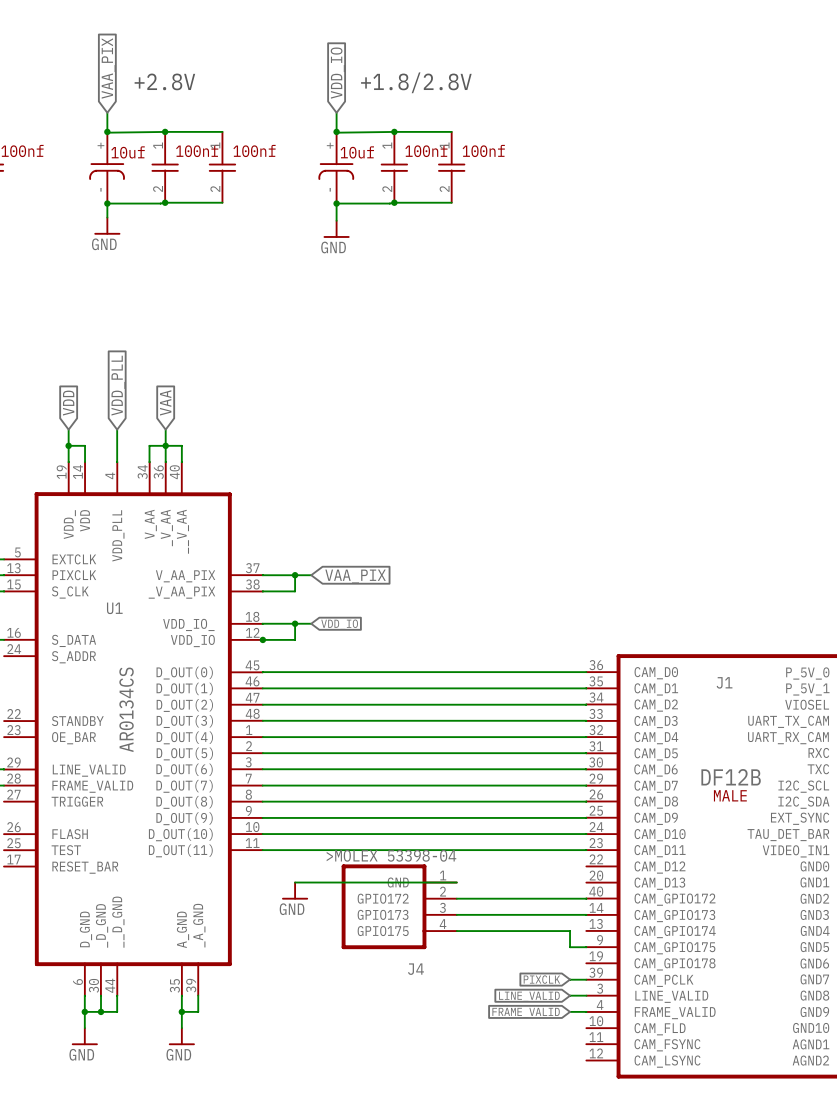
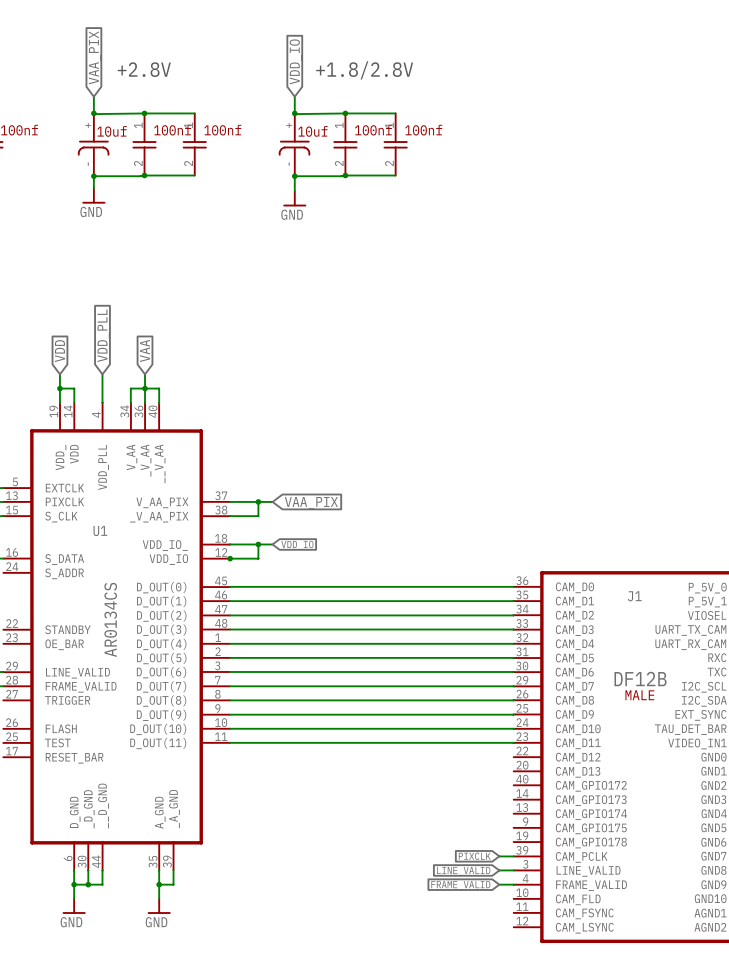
wire: (295, 882) (456, 882) -> none
power symbol: GND (295, 891) -> none
wire: (586, 898) (456, 898) -> none
J4: (399, 906) -> none
wire: (456, 914) (586, 914) -> none
wire: (456, 931) (570, 931) (570, 947) (586, 947) -> none

